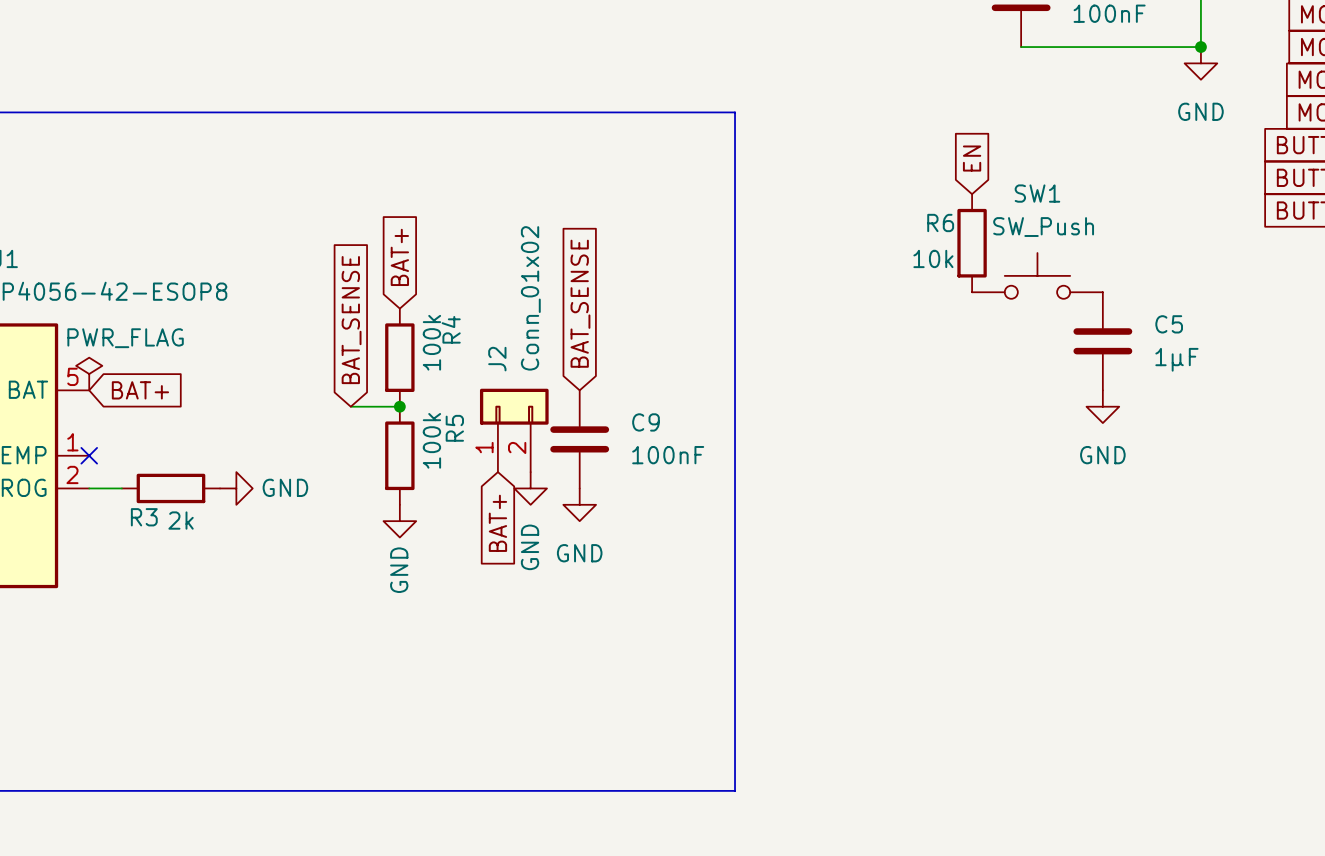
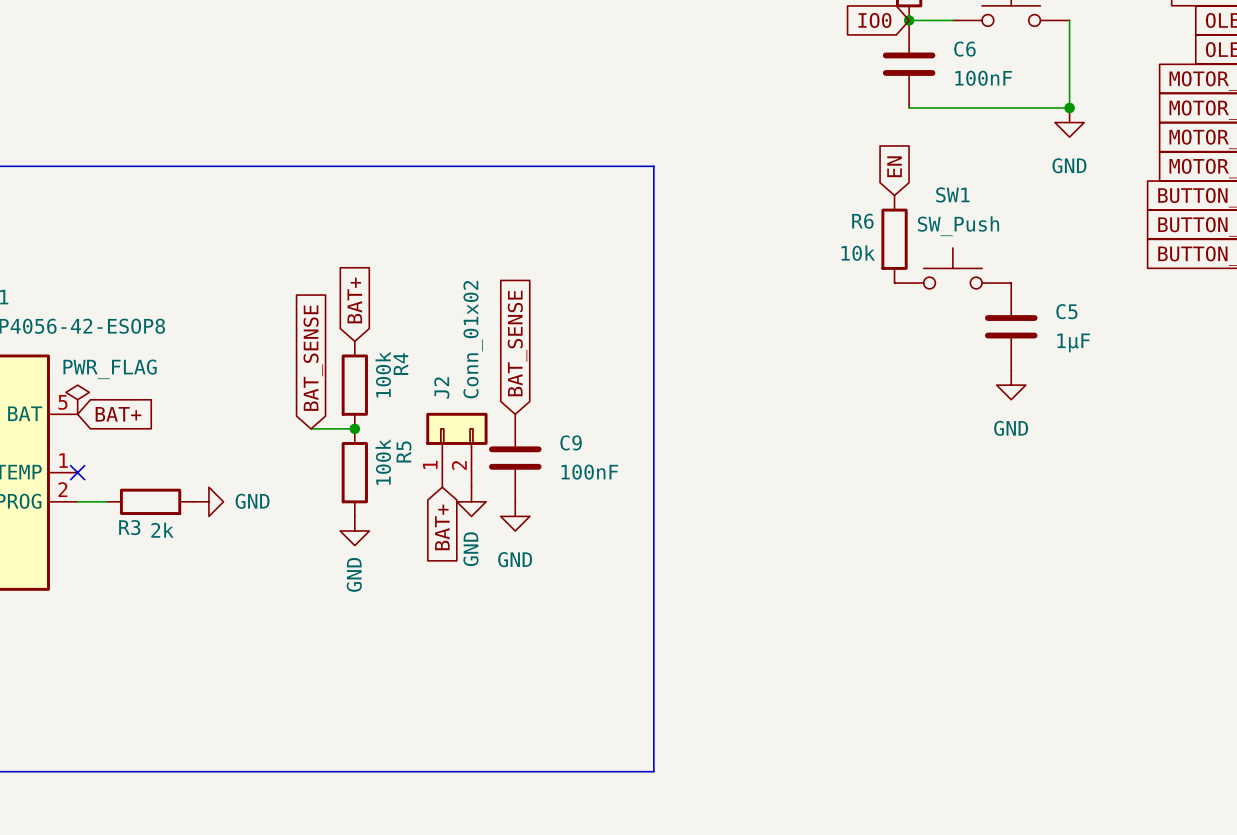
global label position: EN (972, 158) -> EN (894, 166)
R6 position: (972, 243) -> (894, 239)
SW1 position: (1037, 275) -> (952, 268)
C5 position: (1102, 341) -> (1011, 326)
power symbol position: GND (1102, 406) -> GND (1011, 385)

